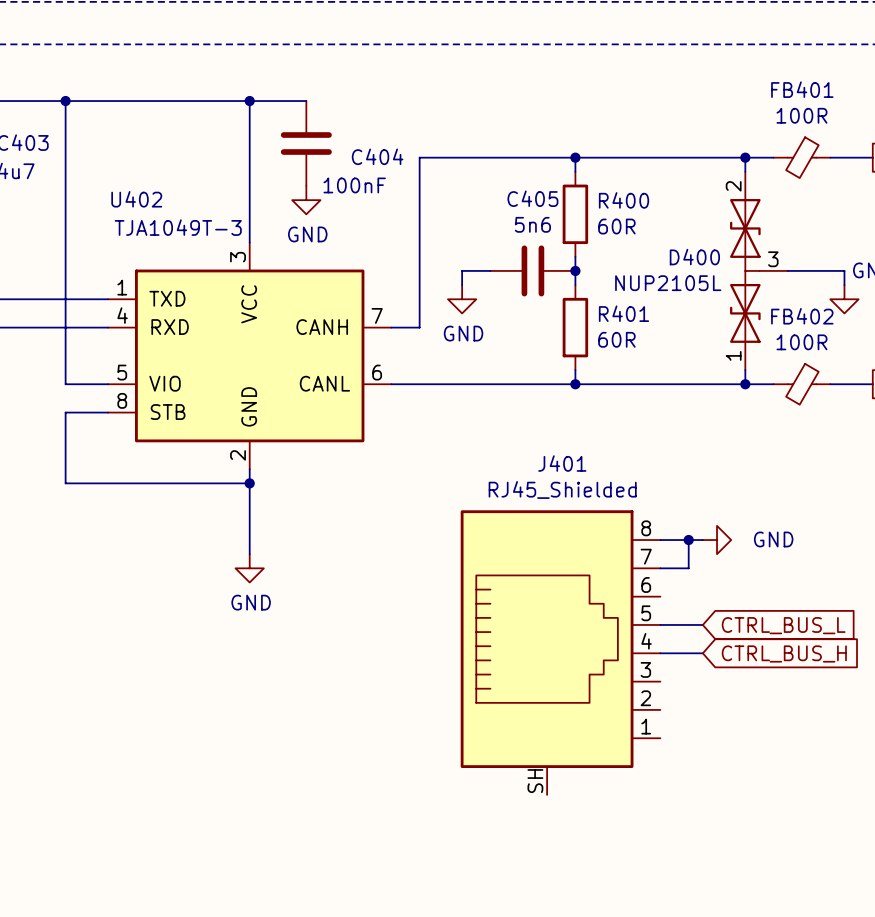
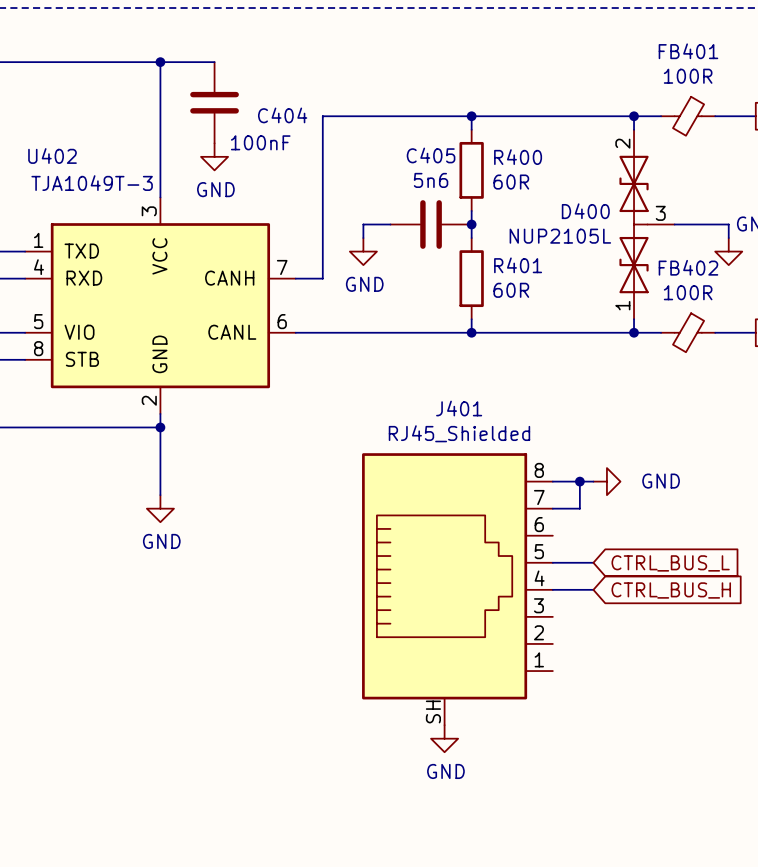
power symbol: none -> GND (444, 738)

